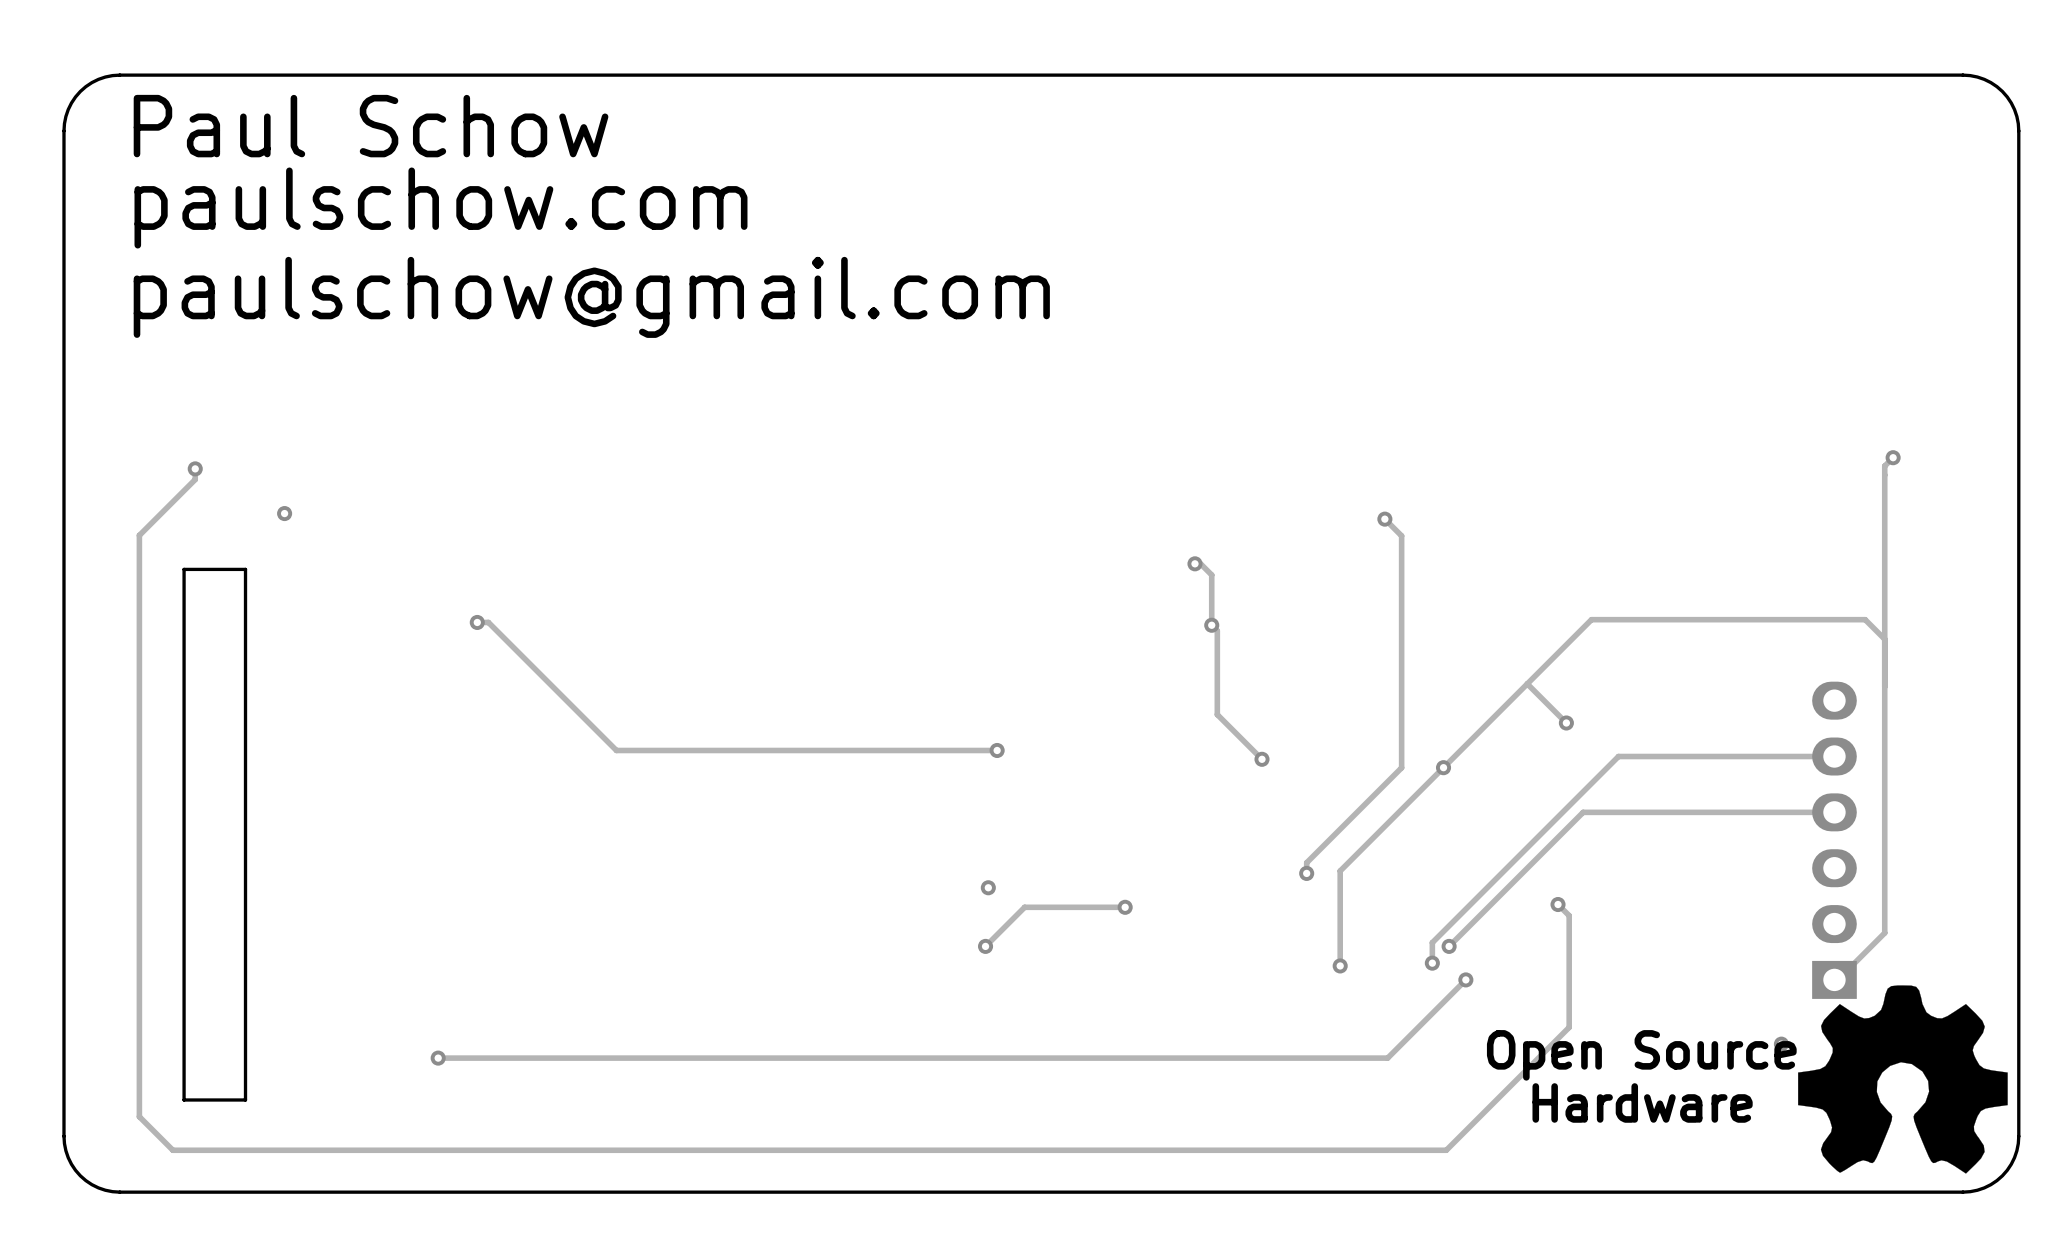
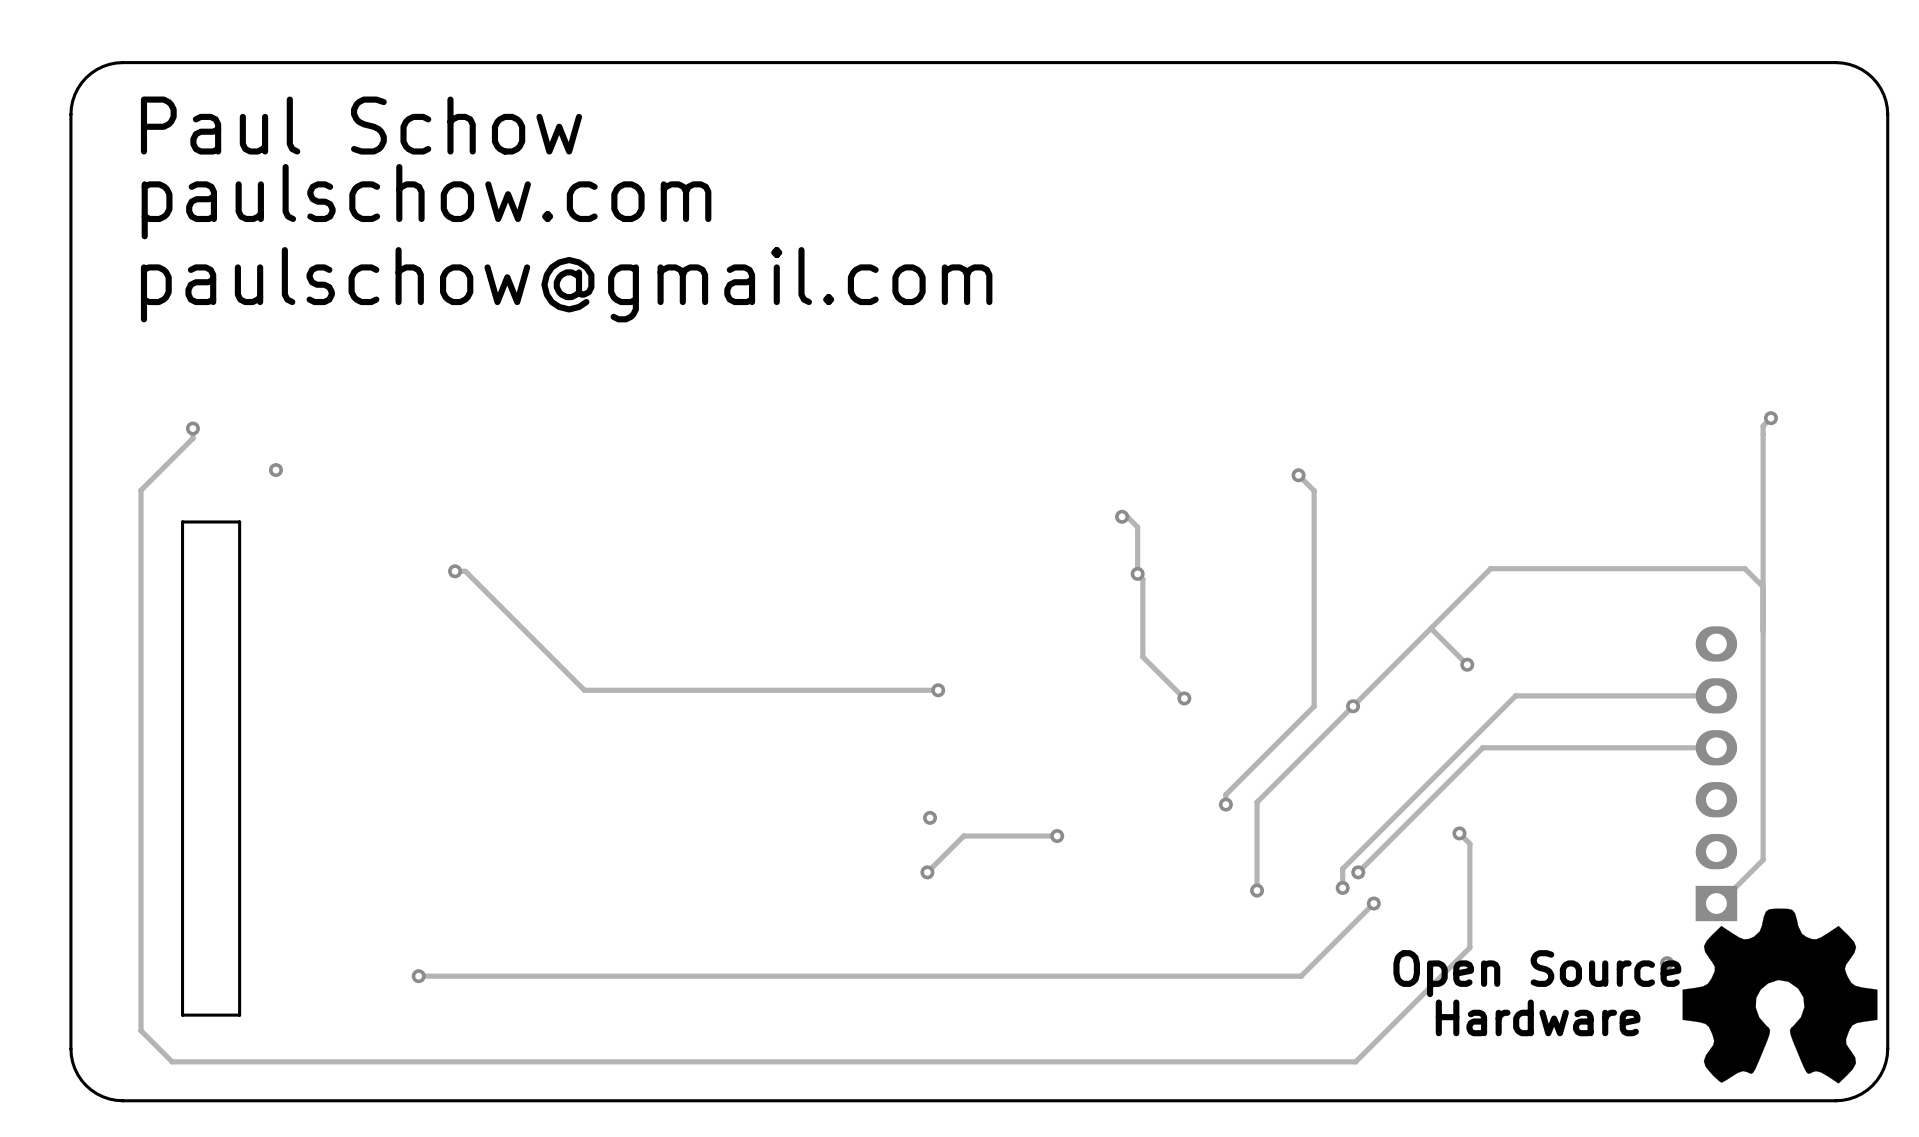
text position: Paul Schow (371, 126) -> Paul Schow (361, 125)
text position: paulschow.com (440, 208) -> paulschow.com (426, 201)
text position: paulschow@gmail.com (591, 297) -> paulschow@gmail.com (566, 284)

